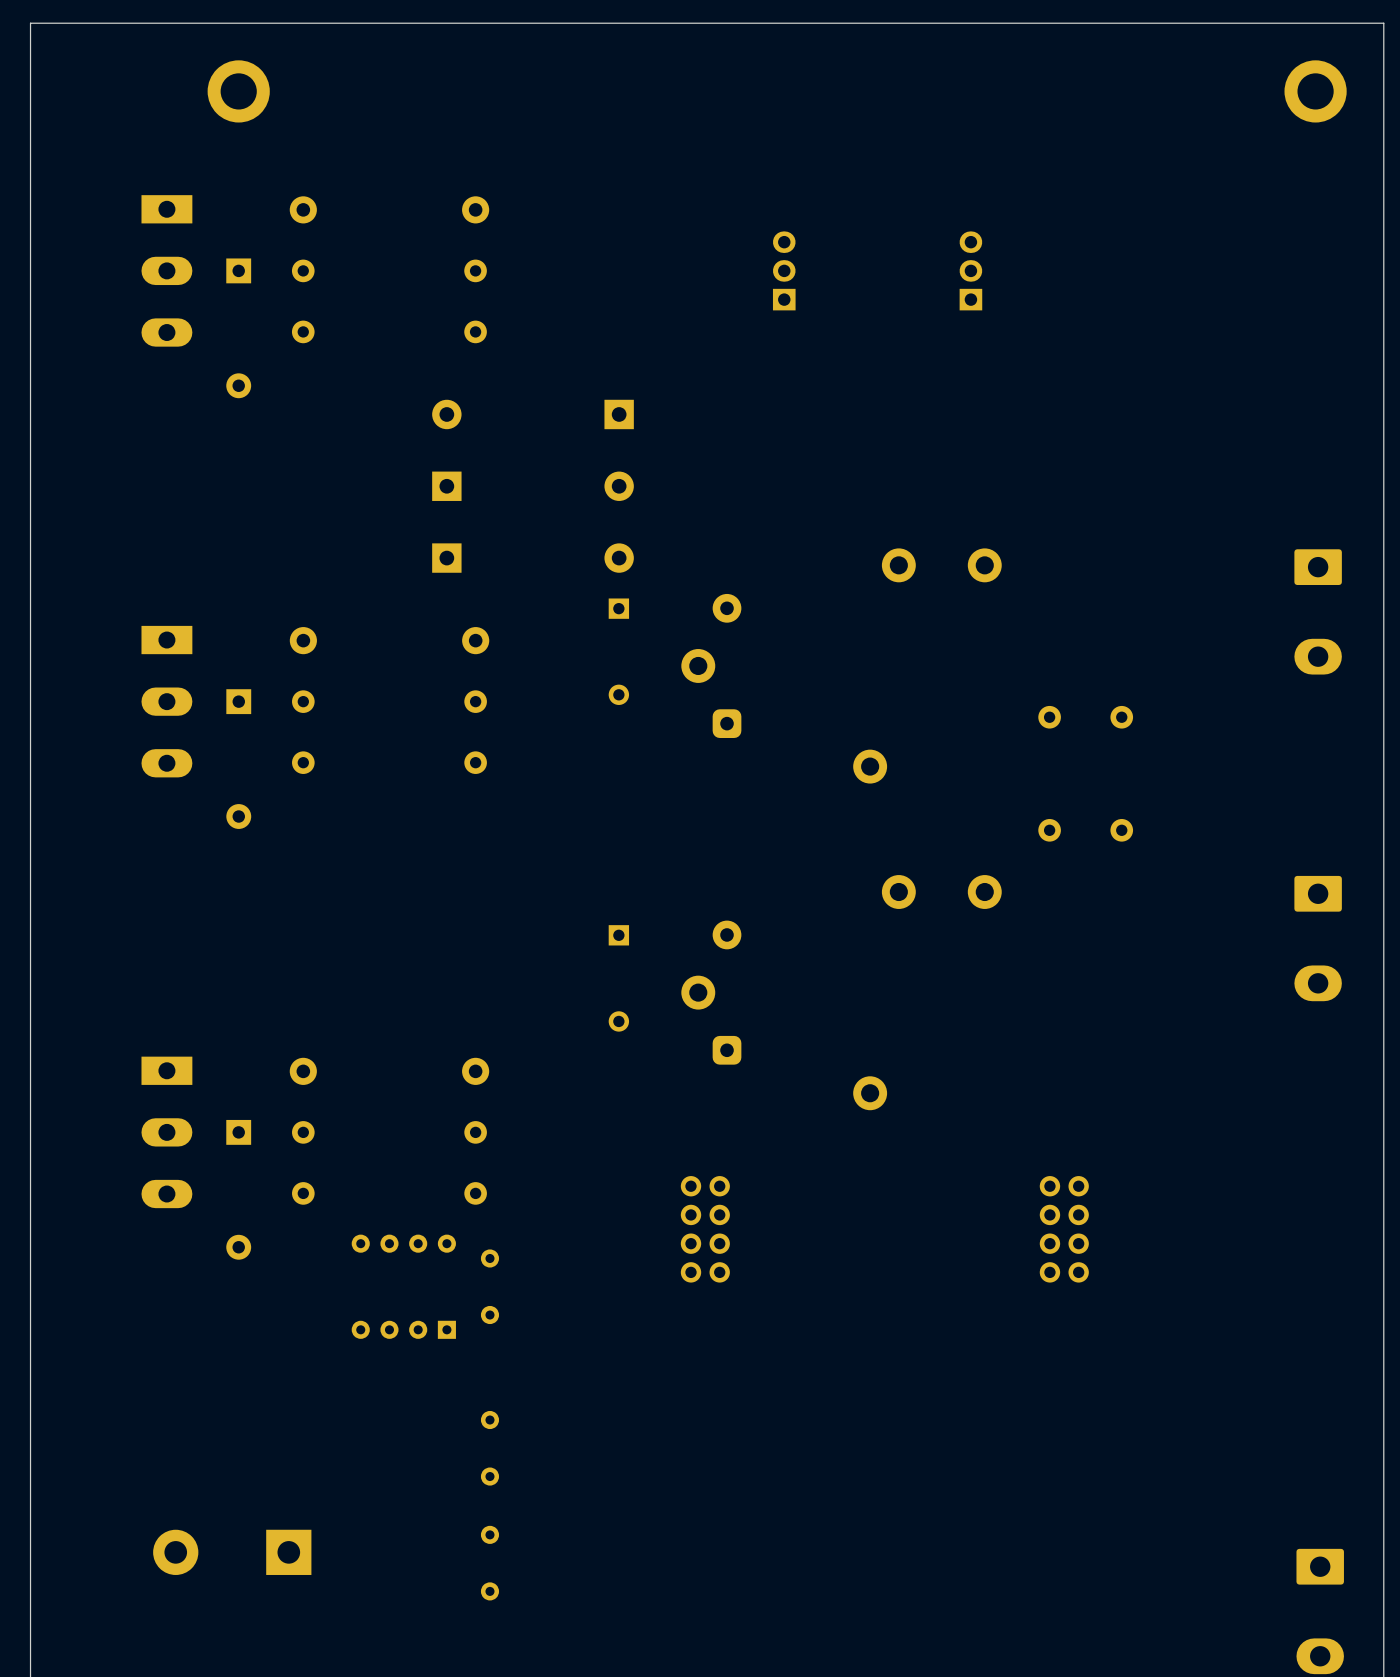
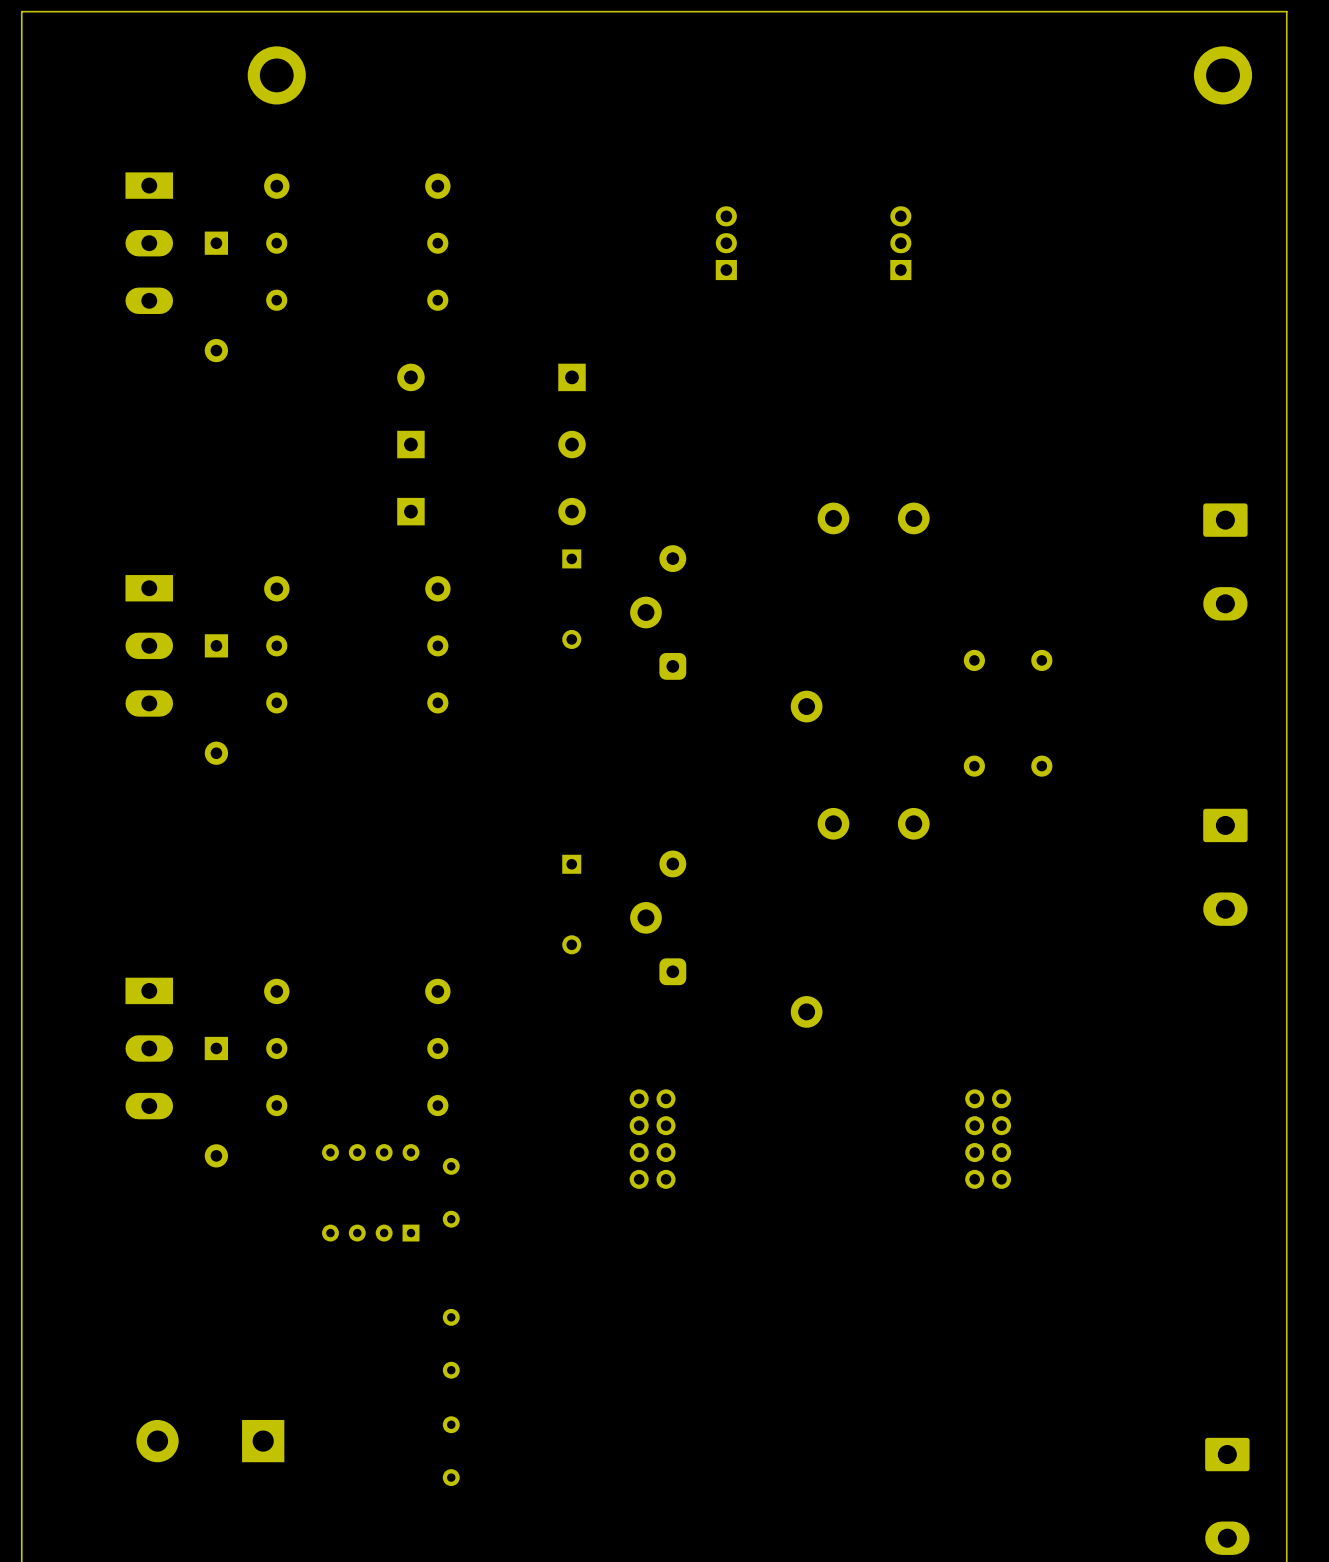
part position: (238, 91) -> (276, 75)

